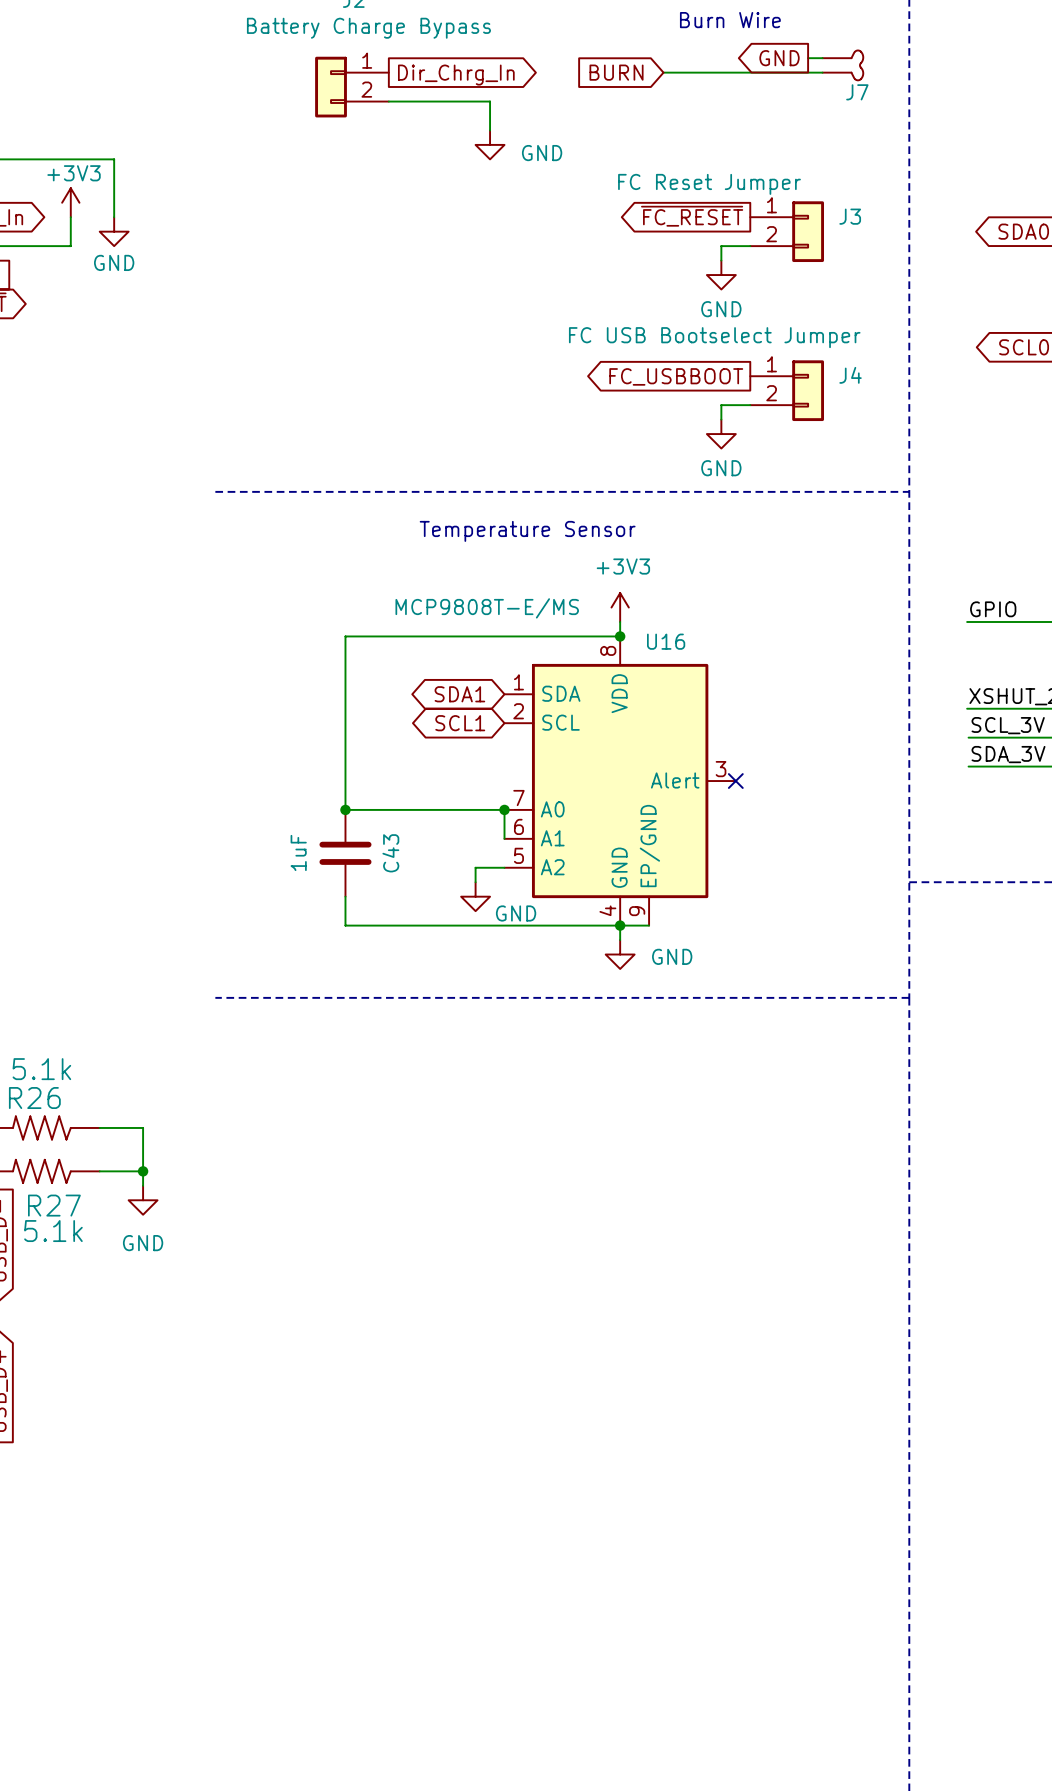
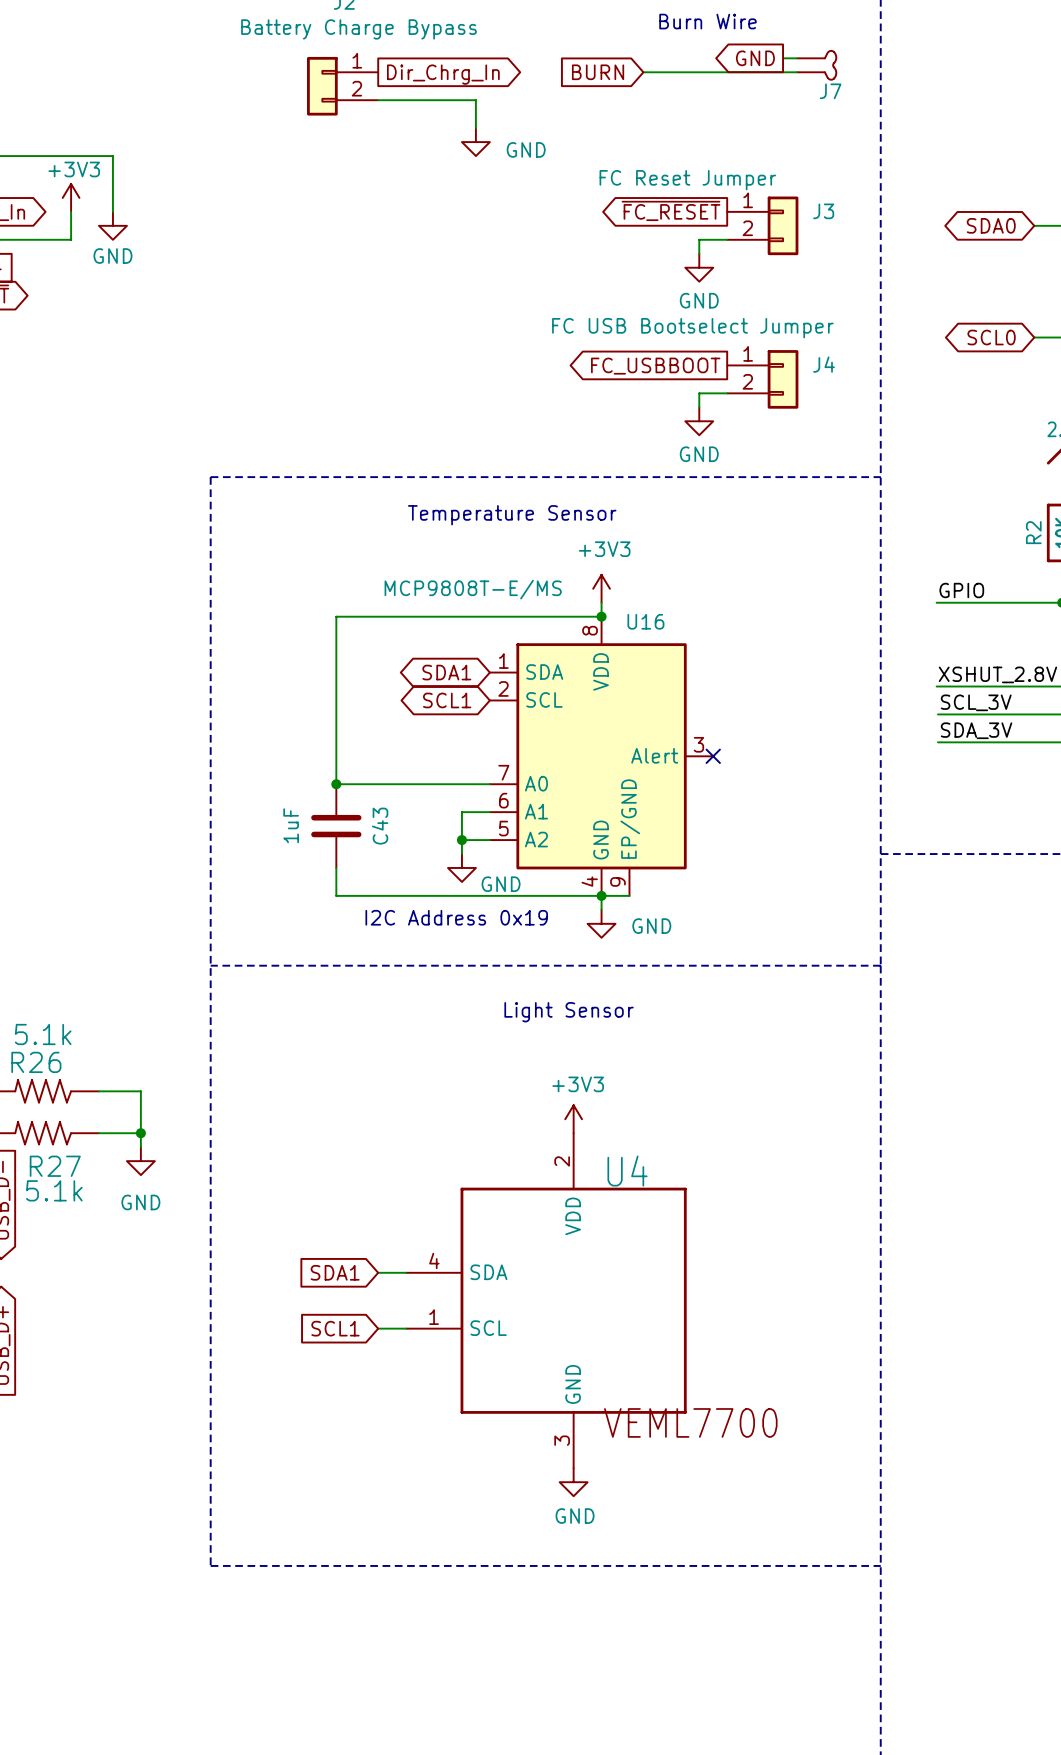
line: none -> (210, 477) (210, 1565) (880, 1565)
wire: (504, 809) (504, 838) -> (461, 840) (461, 812) (489, 812)
junction position: (504, 809) -> (461, 840)
text: none -> I2C Address 0x19 (456, 917)
text: none -> Light Sensor (569, 1012)
power symbol: none -> +3V3 (573, 1119)
global label: none -> SDA1 (335, 1272)
wire: none -> (378, 1272) (406, 1272)
U4: none -> (546, 1300)
global label: none -> SCL1 (335, 1328)
wire: none -> (378, 1328) (406, 1328)
power symbol: none -> GND (573, 1482)

